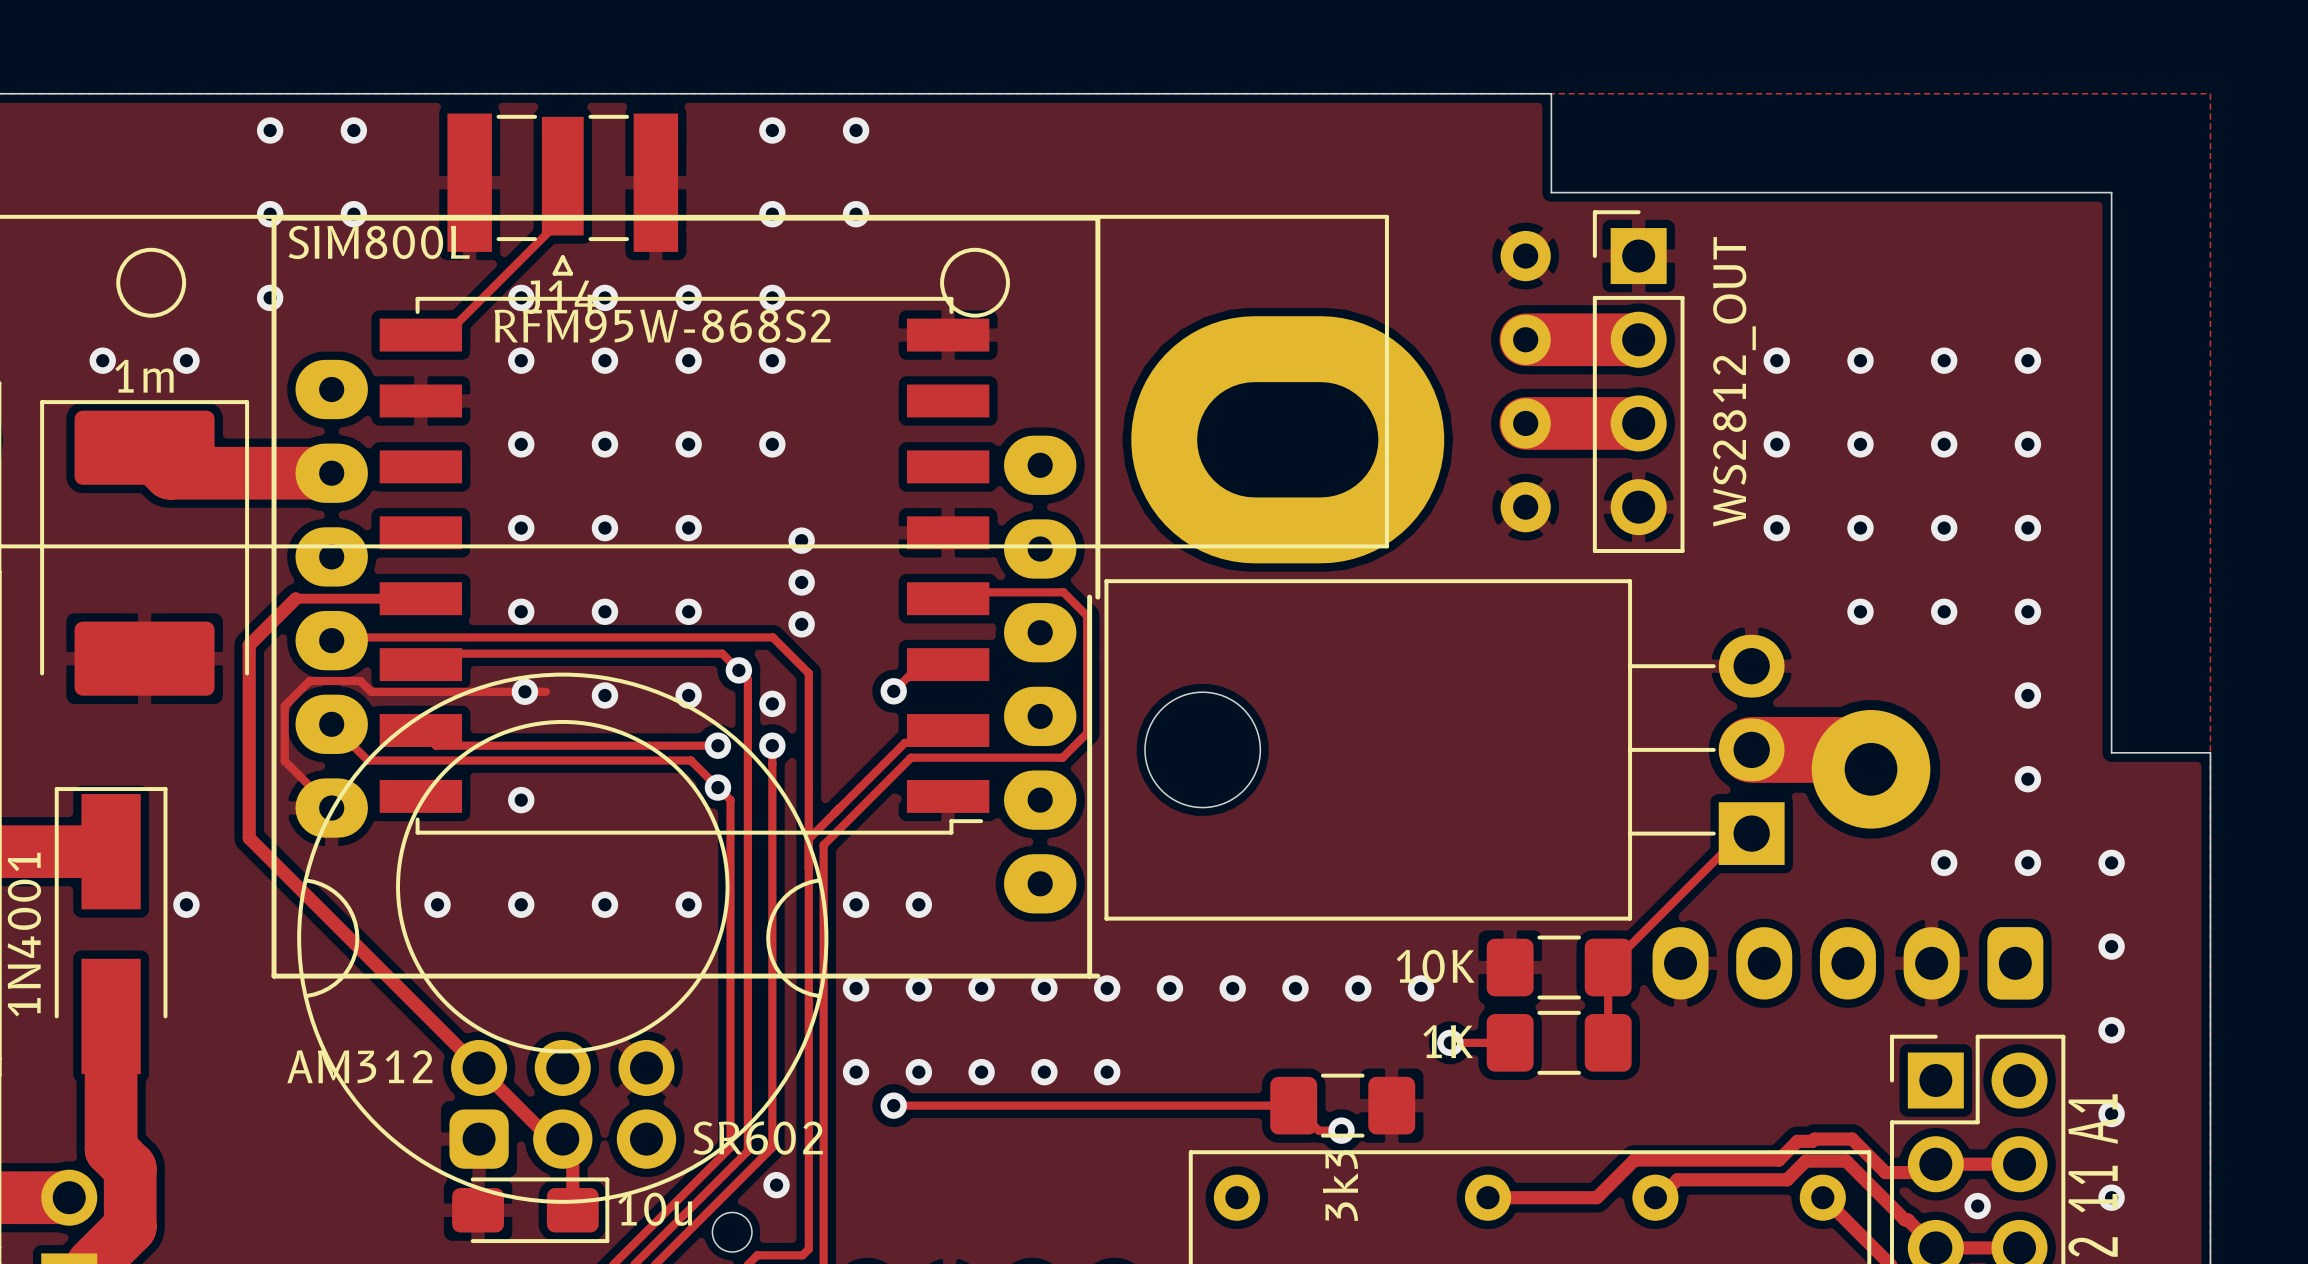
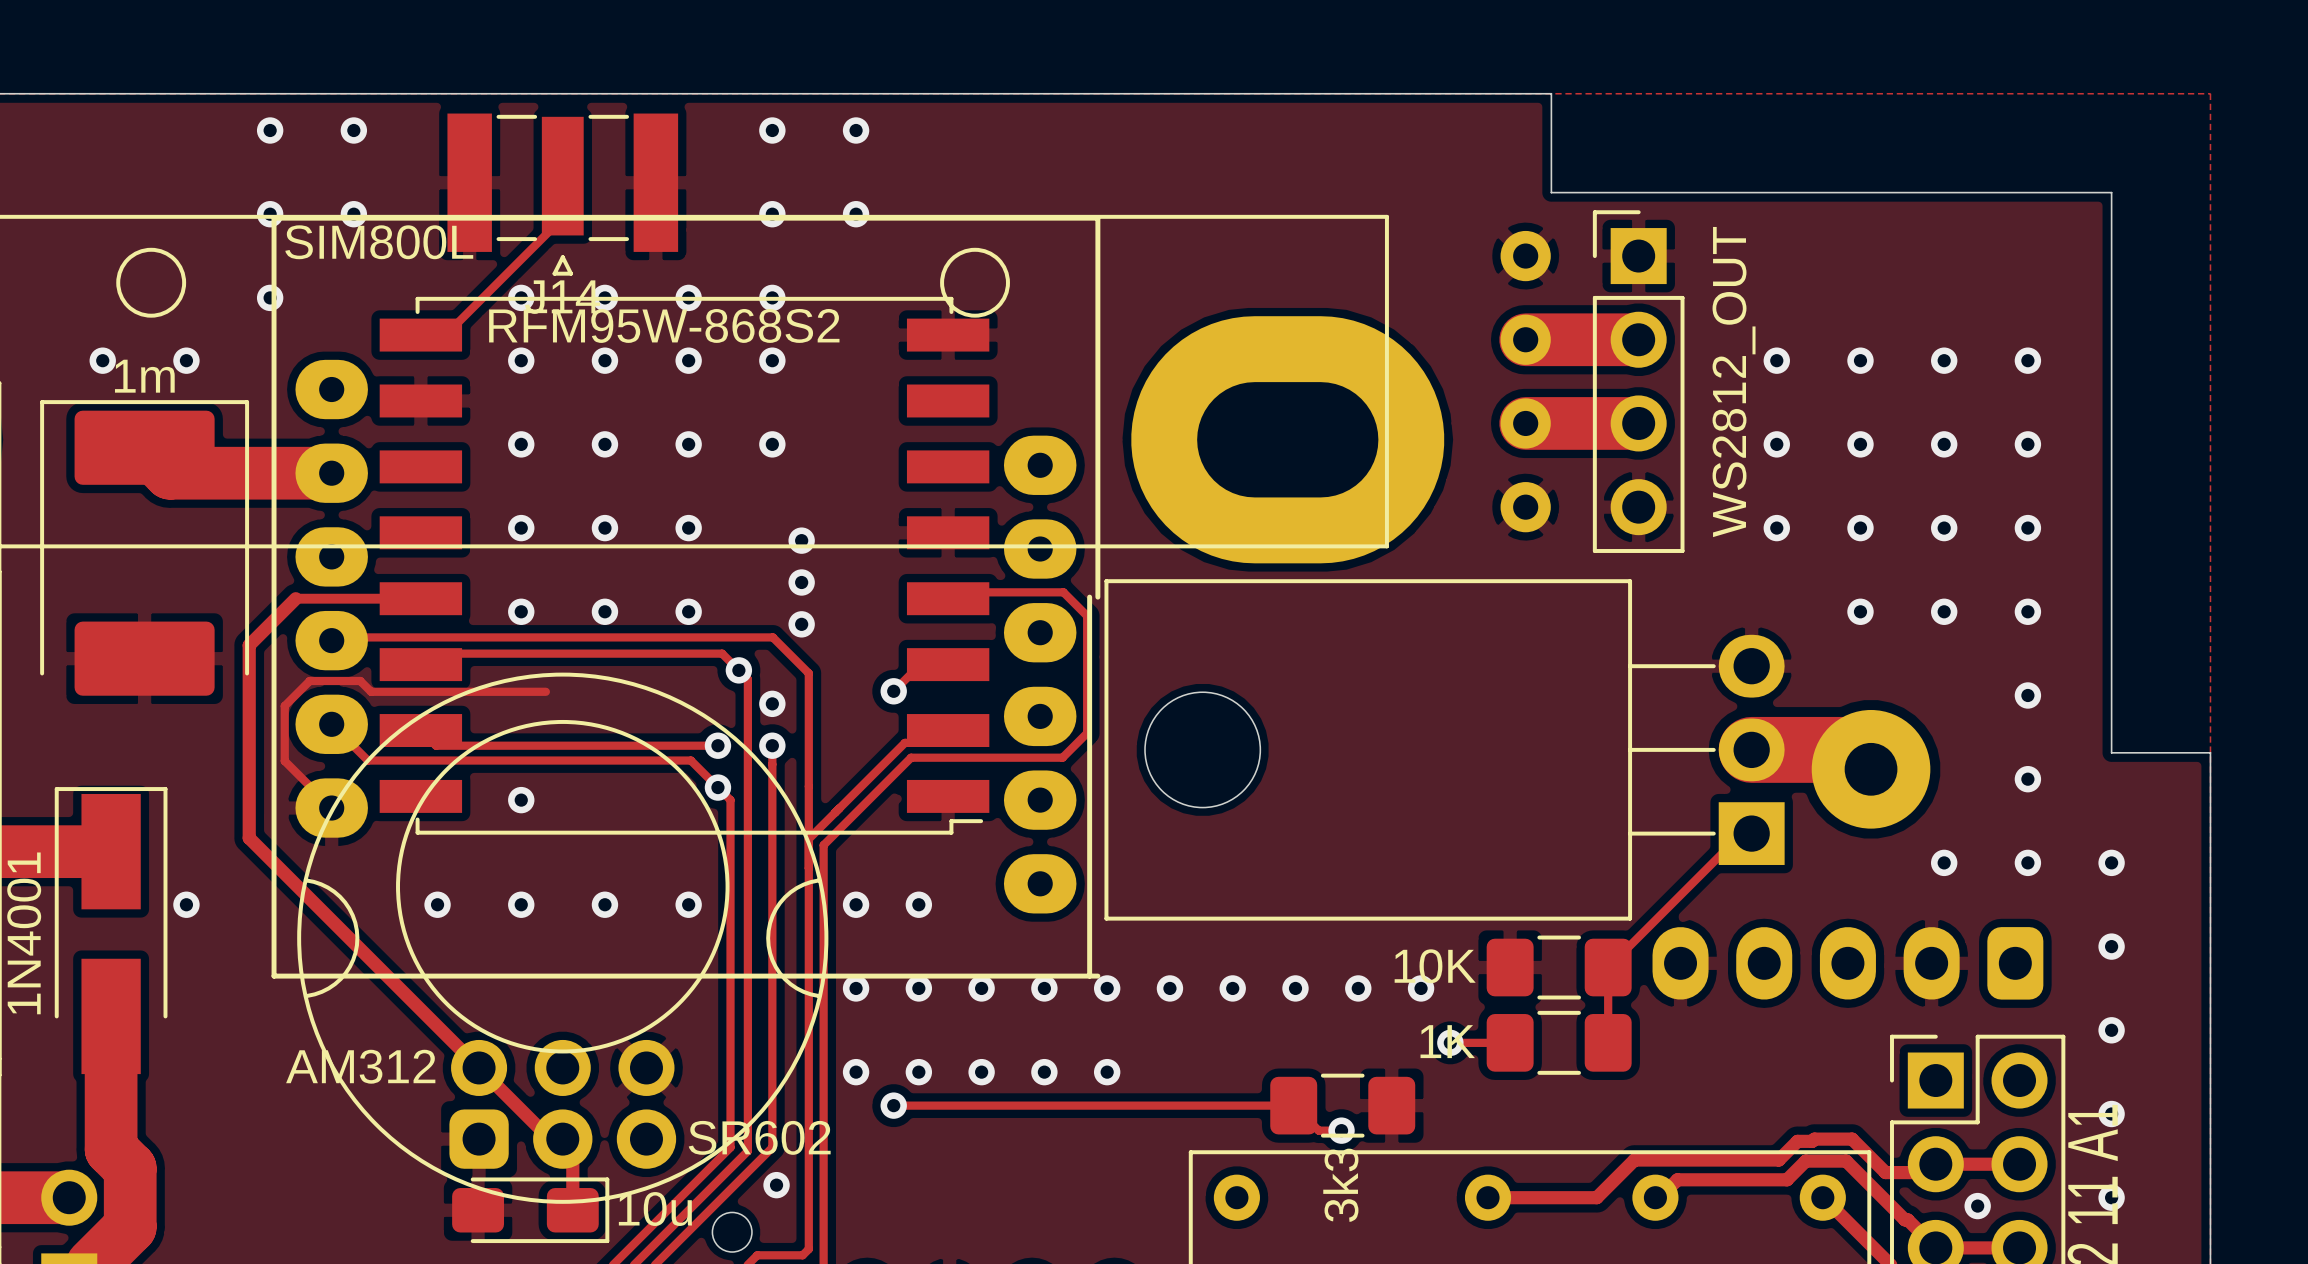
via: (524, 691) -> none
via: (604, 695) -> none
via: (688, 695) -> none

